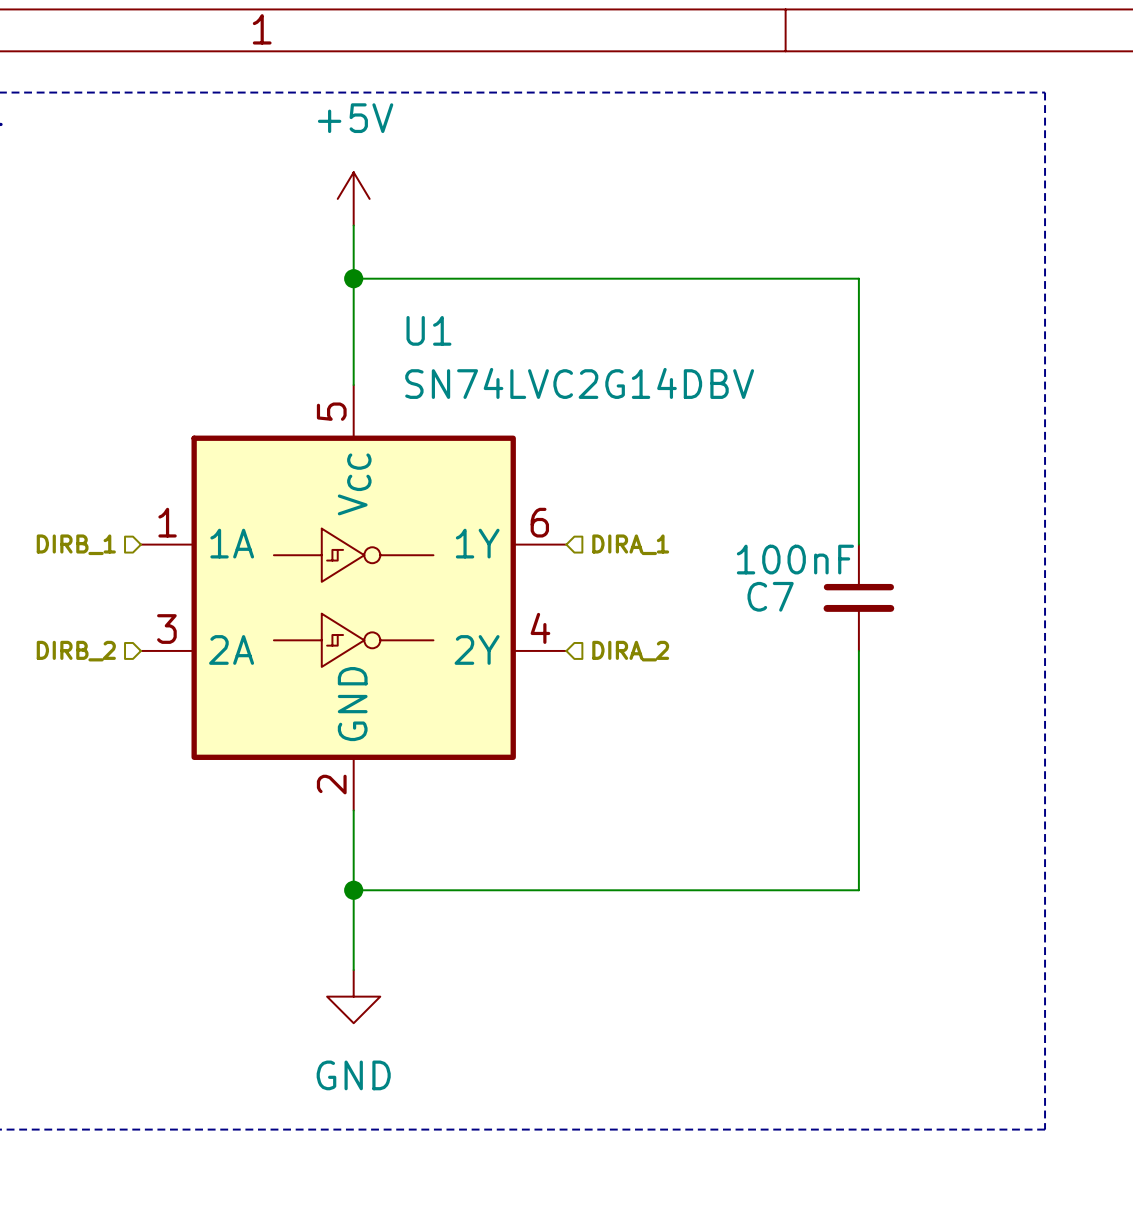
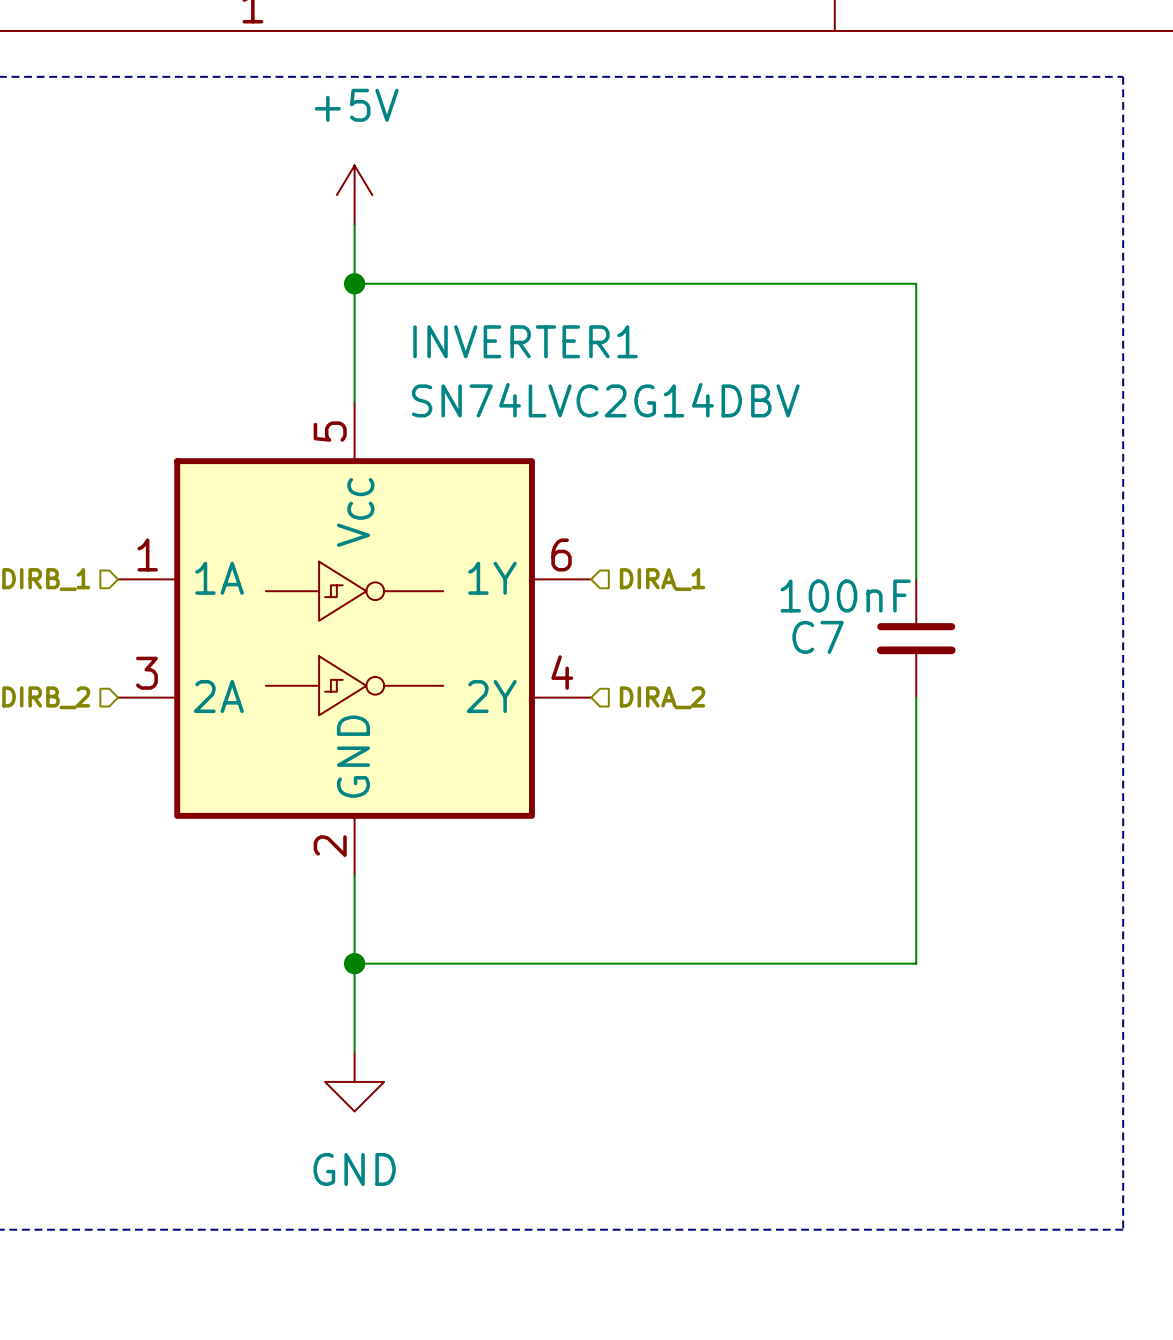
U1 name: U1 (428, 330) -> INVERTER1 (525, 341)

